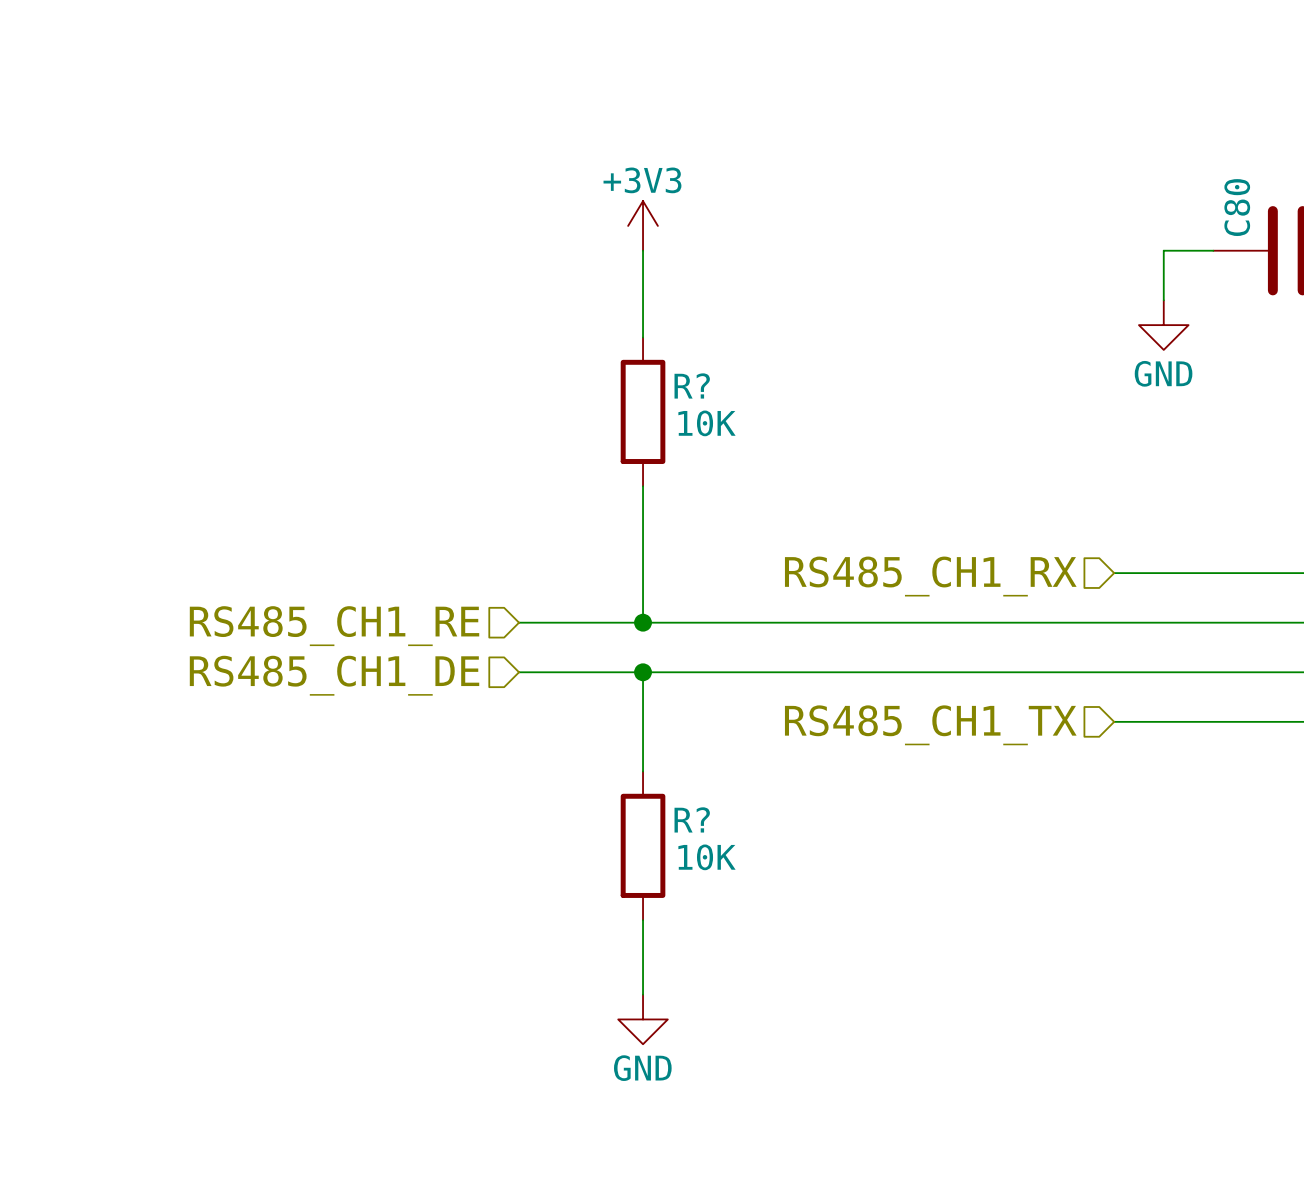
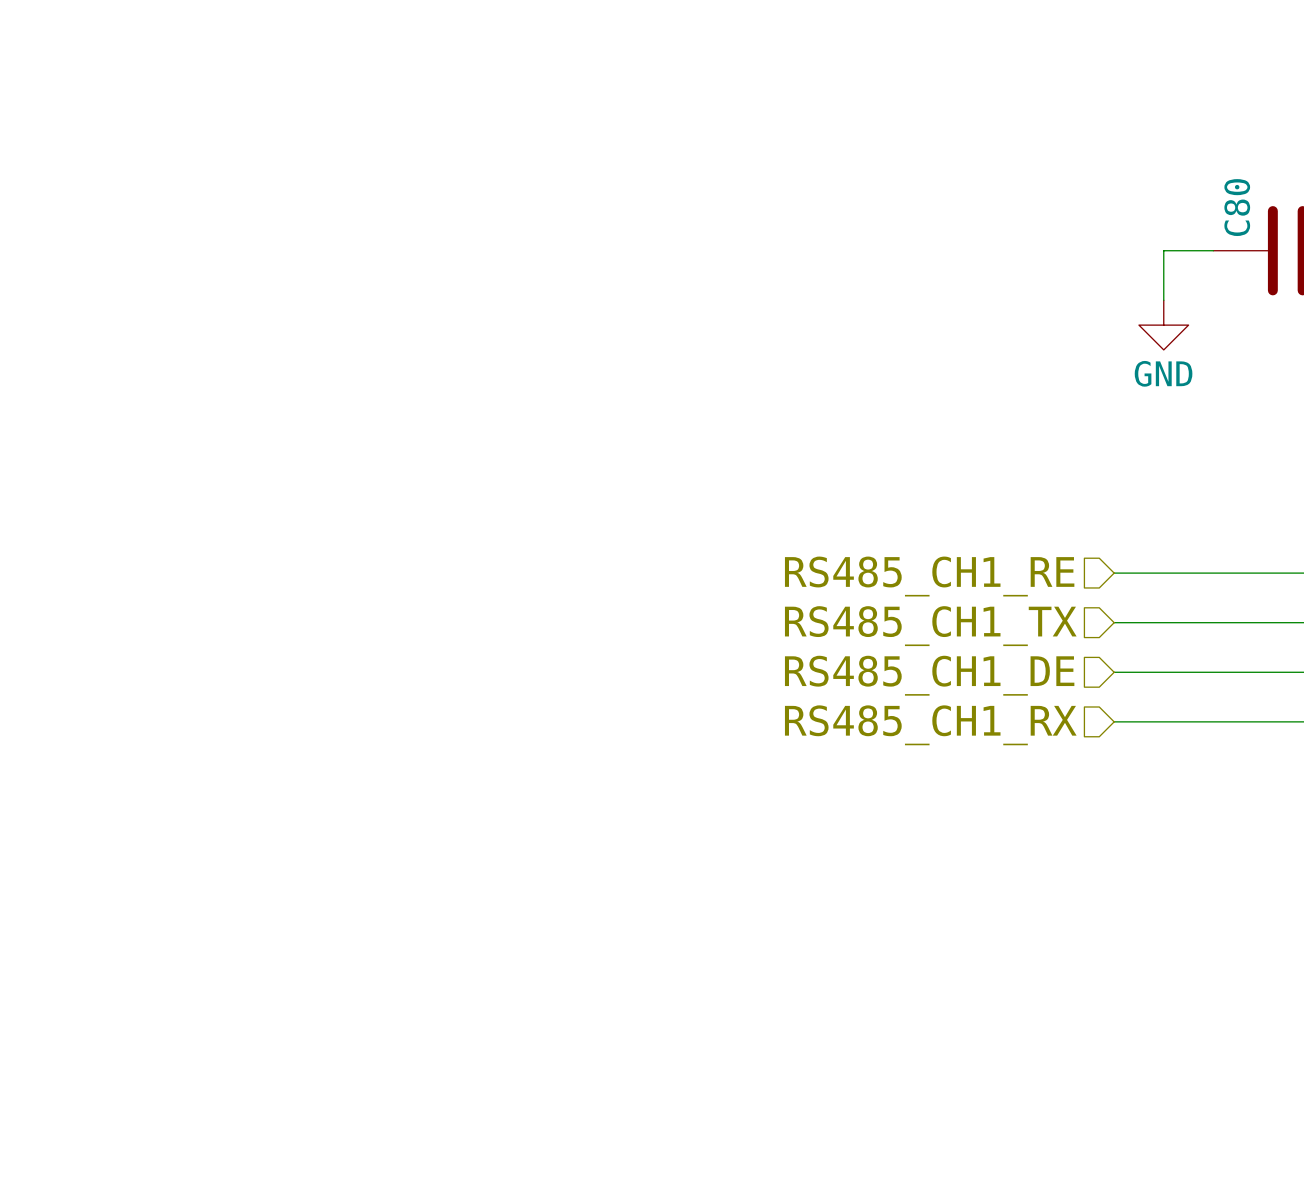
power symbol: +3V3 (643, 225) -> none
wire: (643, 250) (643, 337) -> none
R?: 10K (643, 411) -> none
wire: (643, 486) (643, 622) -> none
hierarchical label: RS485_CH1_RX (930, 576) -> RS485_CH1_RE (929, 576)
wire: (519, 622) (1114, 622) -> none
junction: (643, 622) -> none
hierarchical label: RS485_CH1_RE (334, 626) -> none
hierarchical label: none -> RS485_CH1_TX (930, 626)
wire: (519, 672) (1114, 672) -> none
wire: (643, 672) (643, 771) -> none
junction: (643, 672) -> none
hierarchical label: RS485_CH1_DE (334, 675) -> none
hierarchical label: none -> RS485_CH1_DE (929, 675)
hierarchical label: RS485_CH1_TX (930, 725) -> RS485_CH1_RX (930, 725)
R?: 10K (643, 845) -> none
wire: (643, 920) (643, 994) -> none
power symbol: GND (643, 1019) -> none

